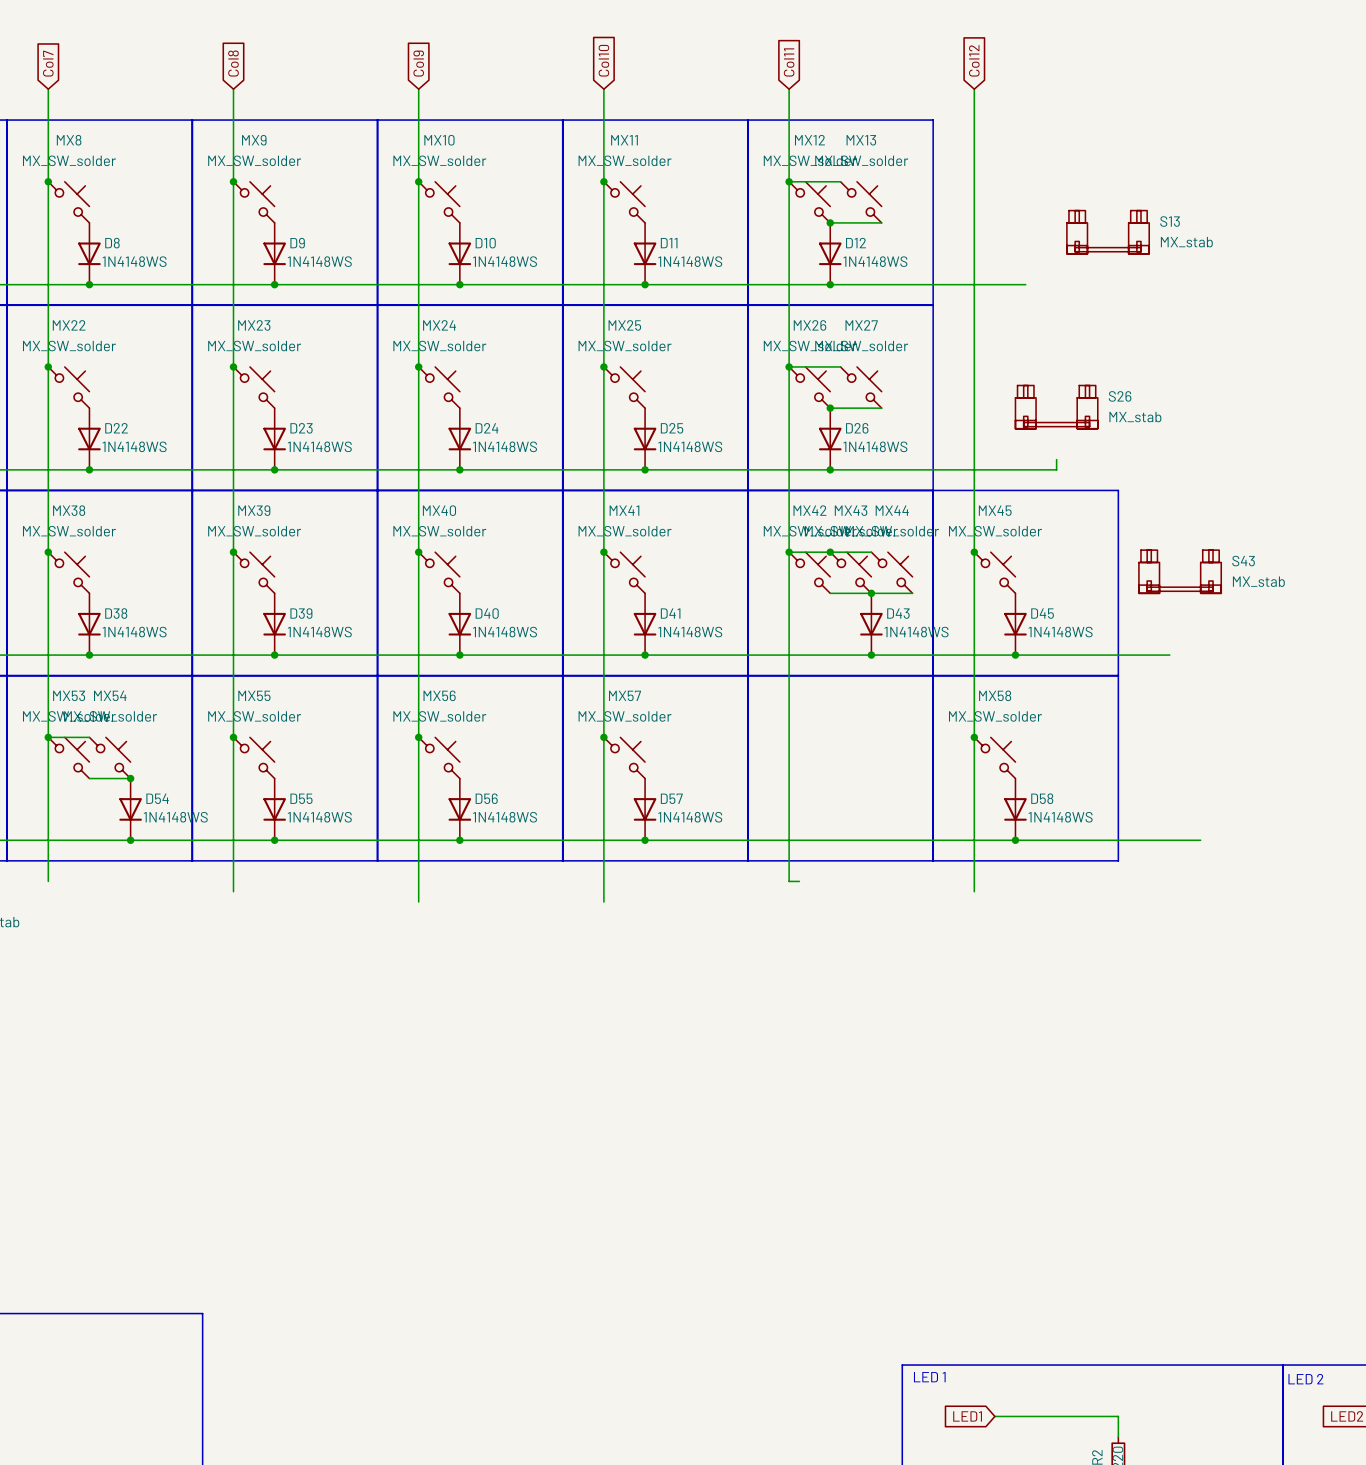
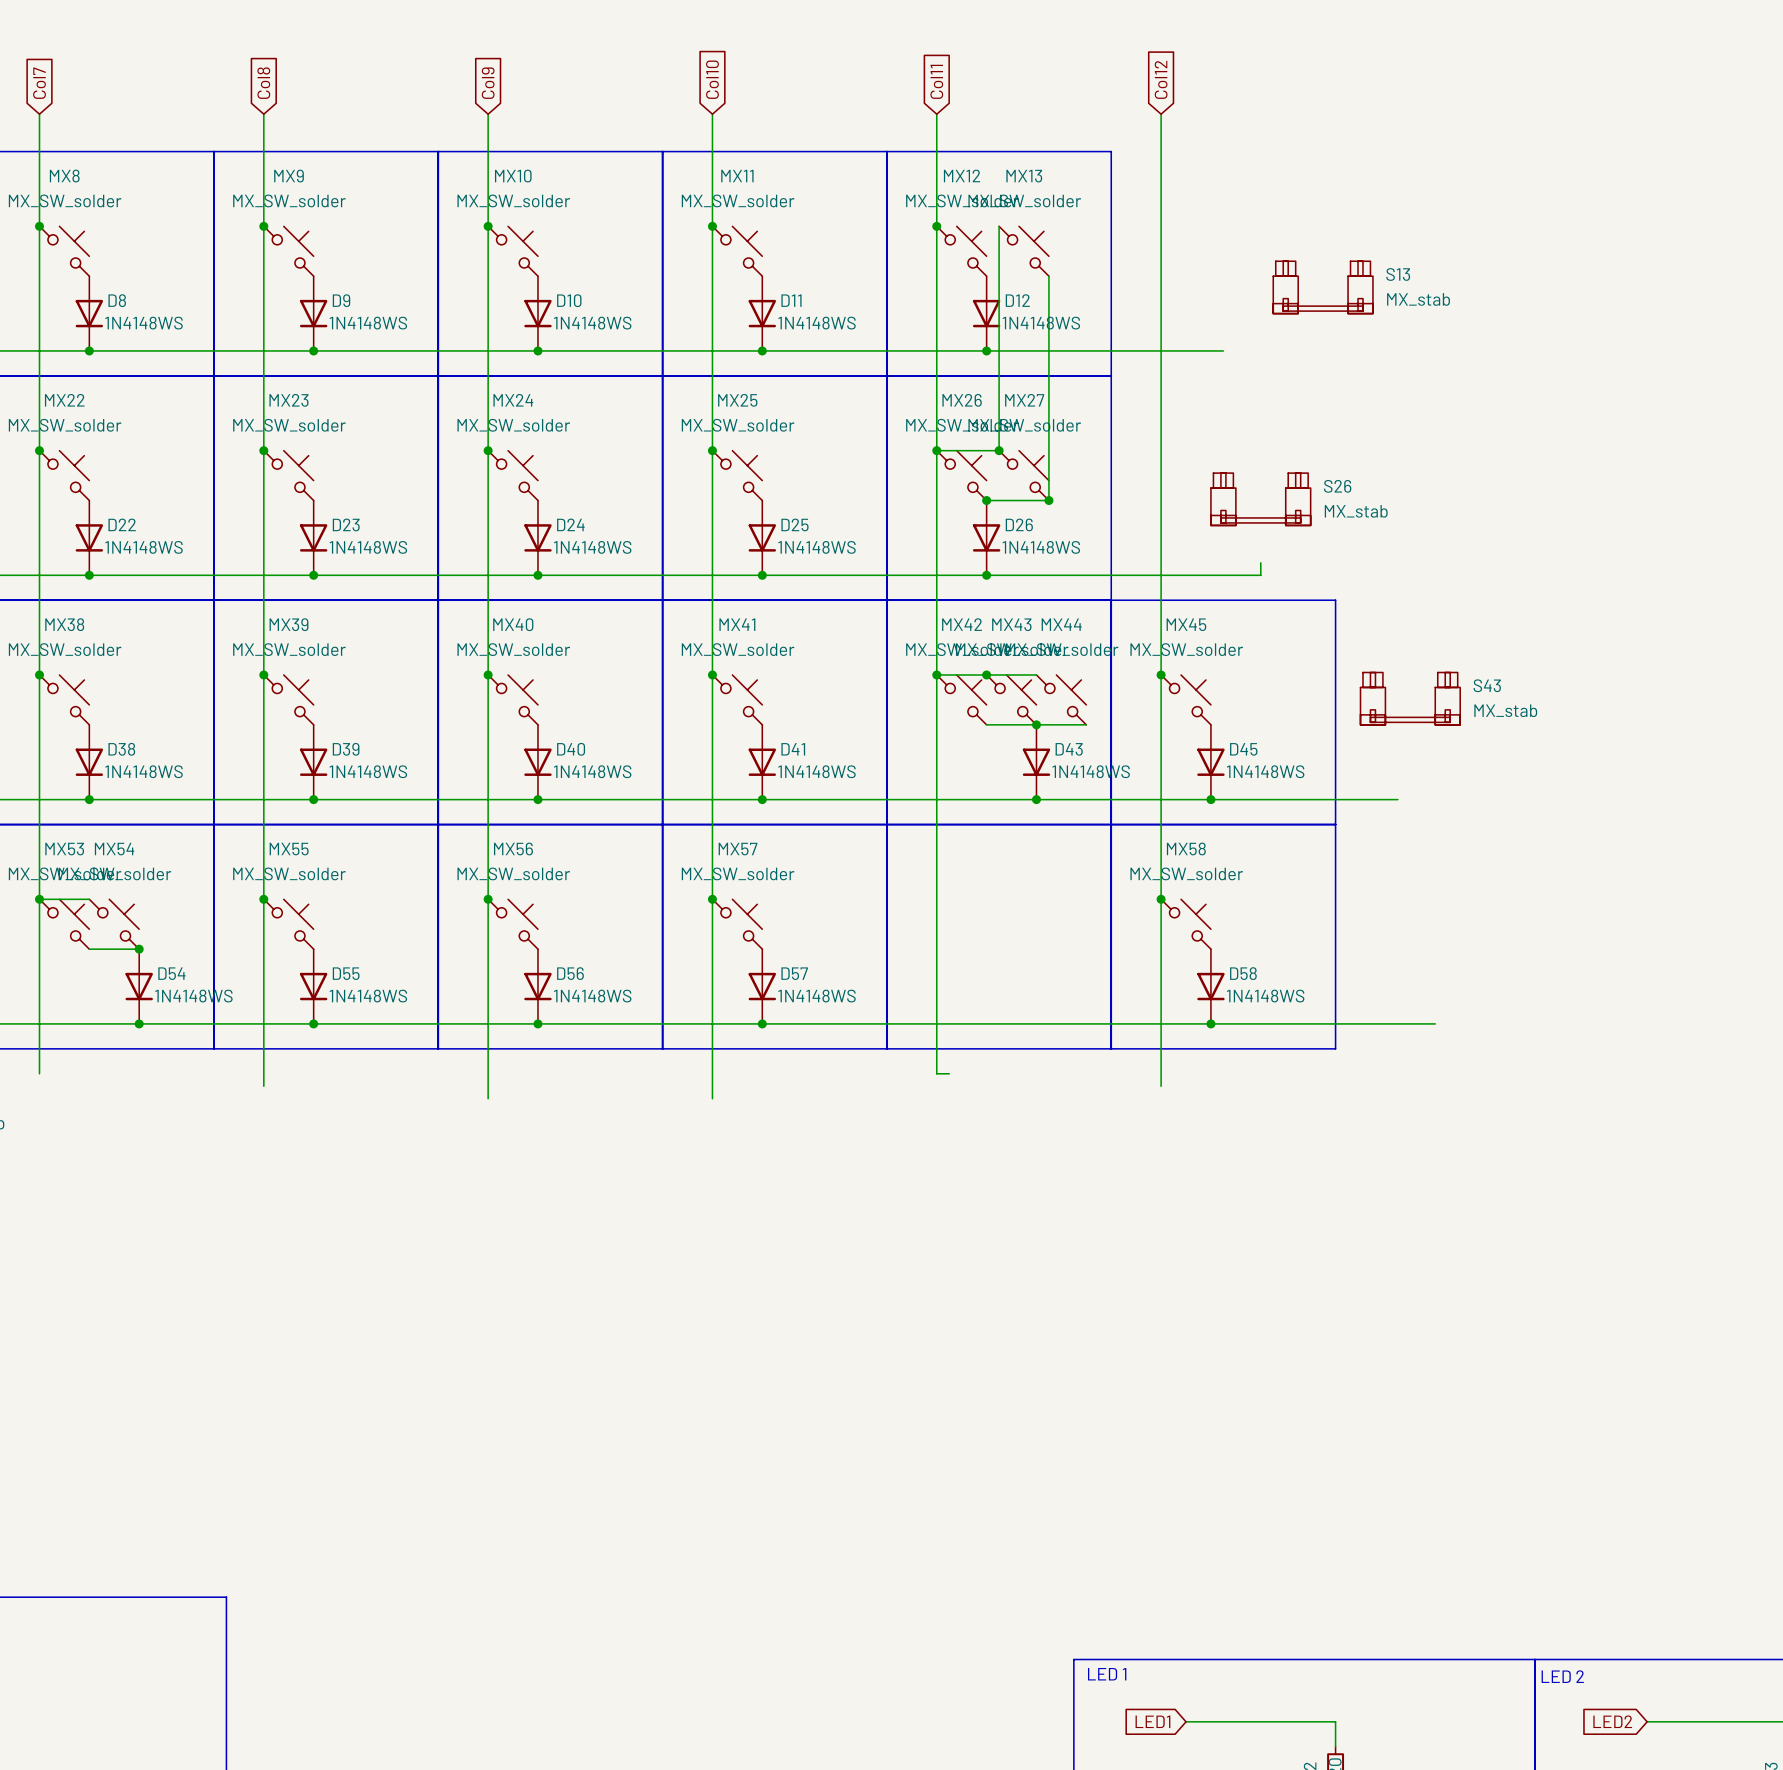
wire: (789, 181) (840, 181) -> (999, 450) (999, 226)
wire: (830, 222) (881, 222) -> (1048, 500) (1048, 276)
junction: (830, 222) -> none
junction: none -> (999, 450)
junction: none -> (1048, 500)

